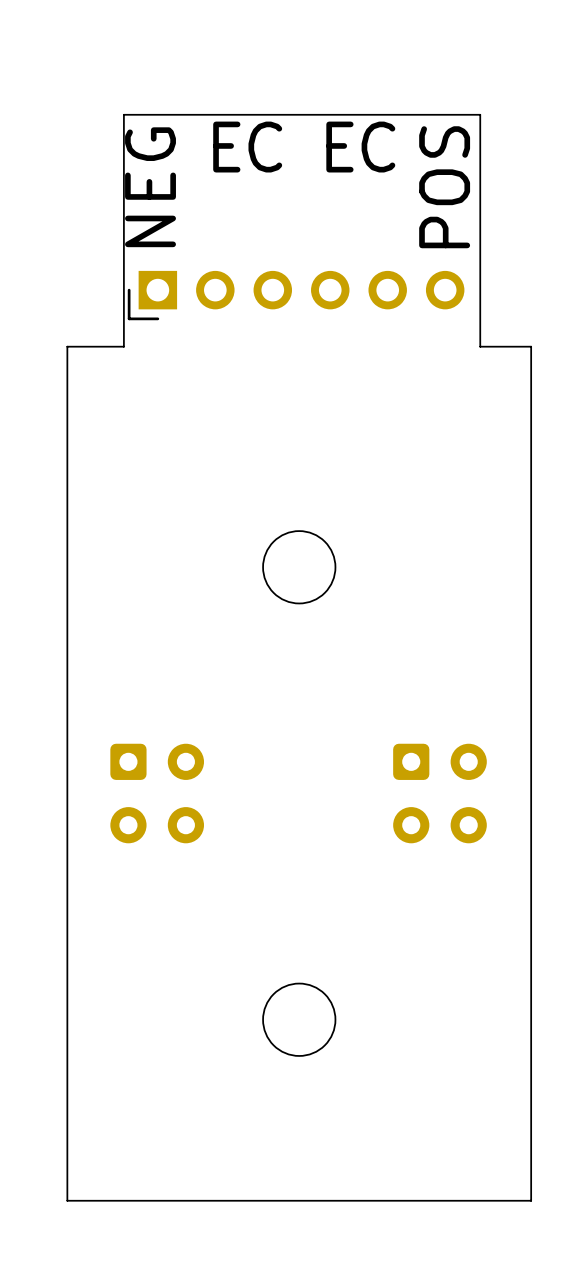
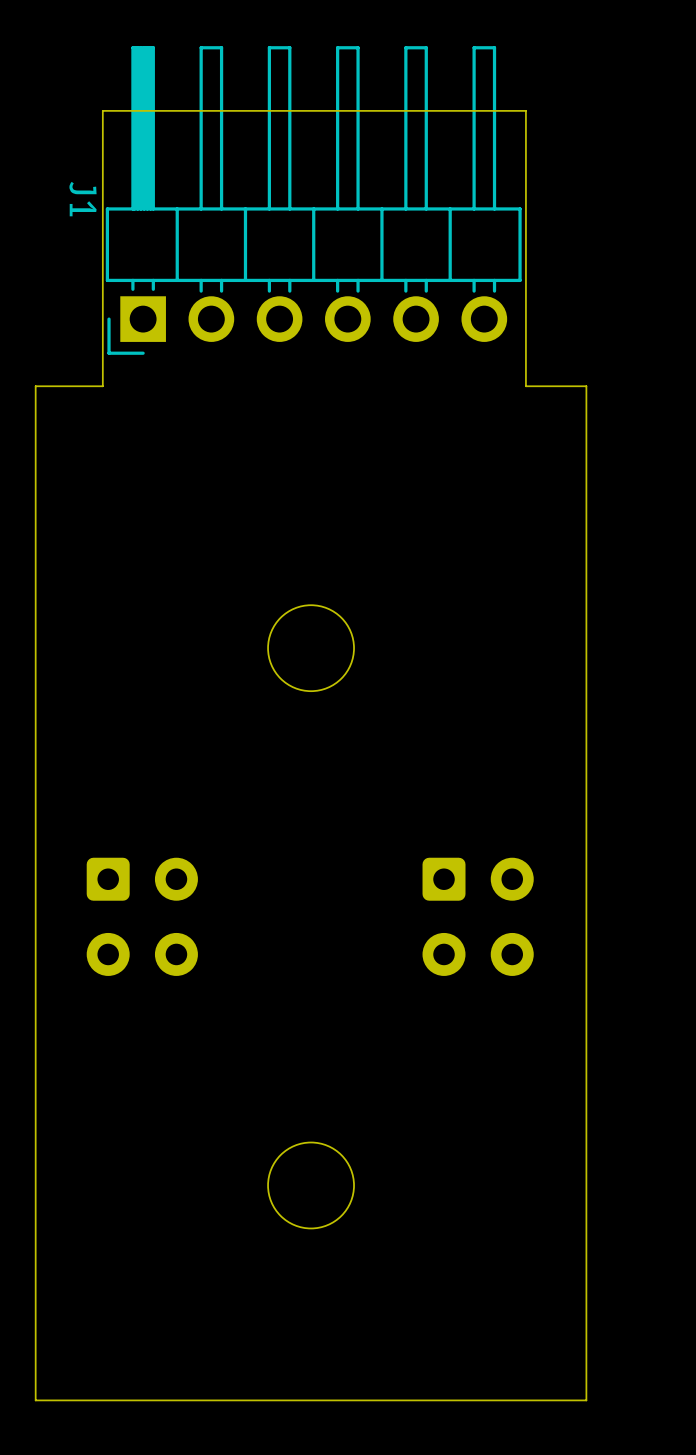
text: E (226, 147) -> none
text: C (265, 147) -> none
text: E (339, 147) -> none
text: C (378, 147) -> none
text: NEG (150, 187) -> none
text: POS (444, 187) -> none
J1: none -> (313, 200)

